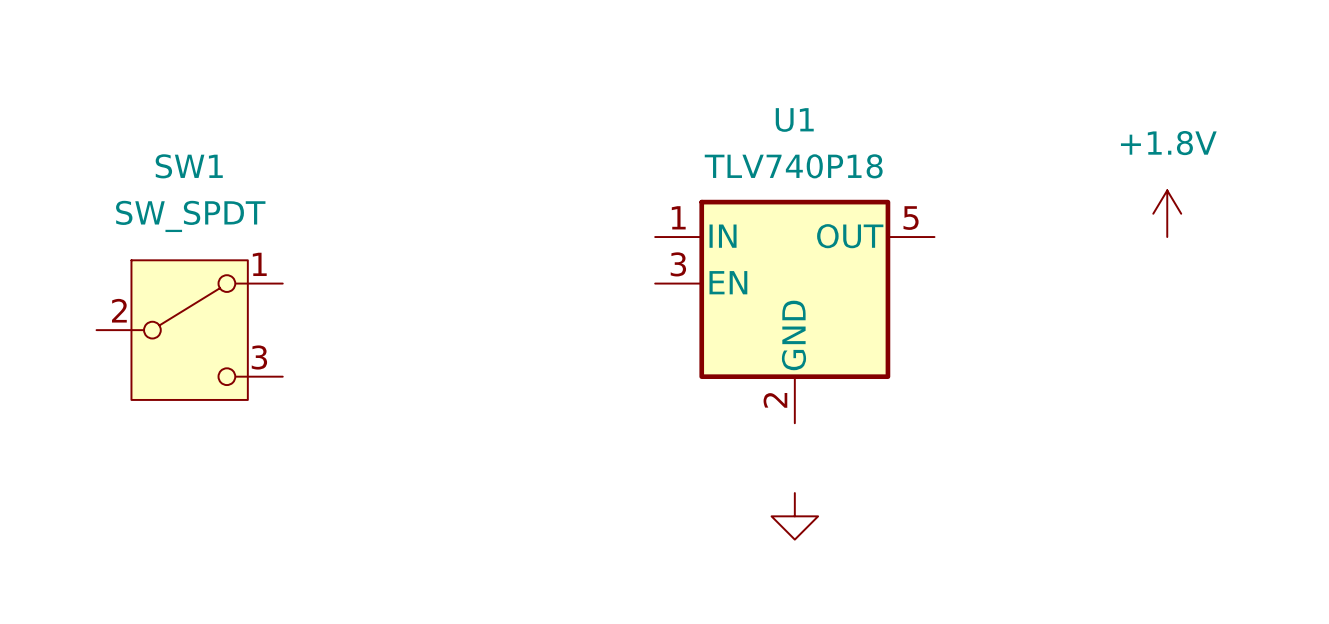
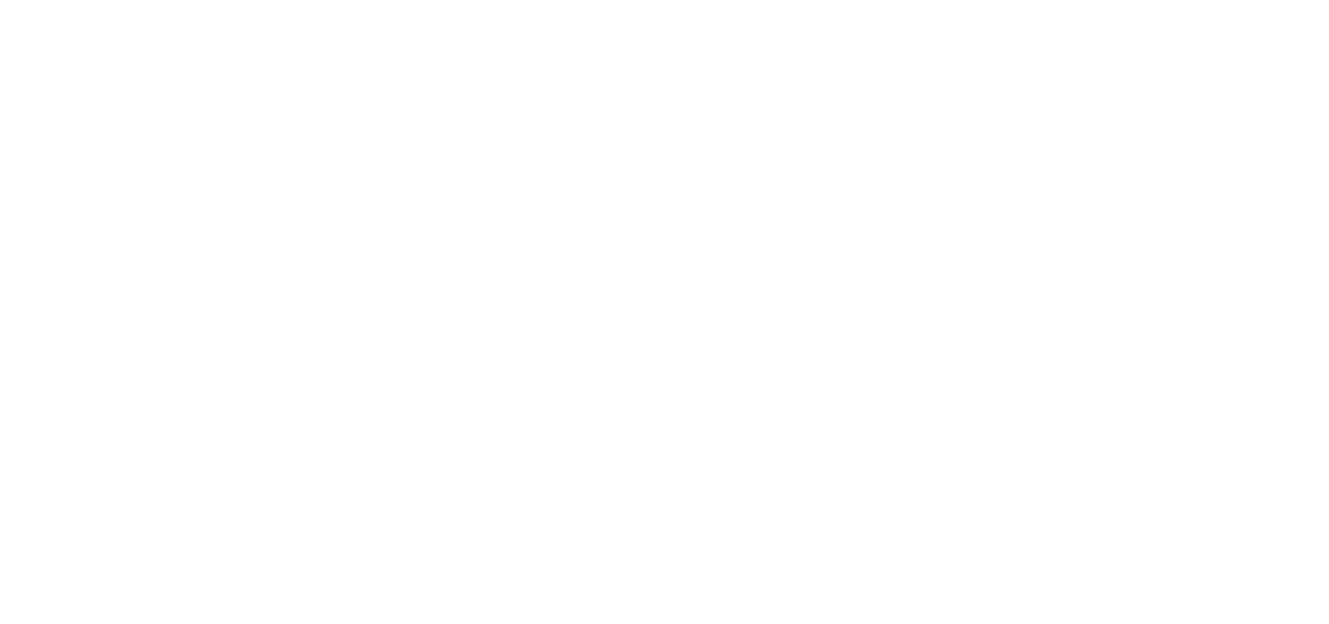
power symbol: +1.8V (1167, 213) -> none
U1: TLV740P18 (794, 311) -> none
SW1: SW_SPDT (189, 330) -> none
power symbol: (794, 516) -> none

